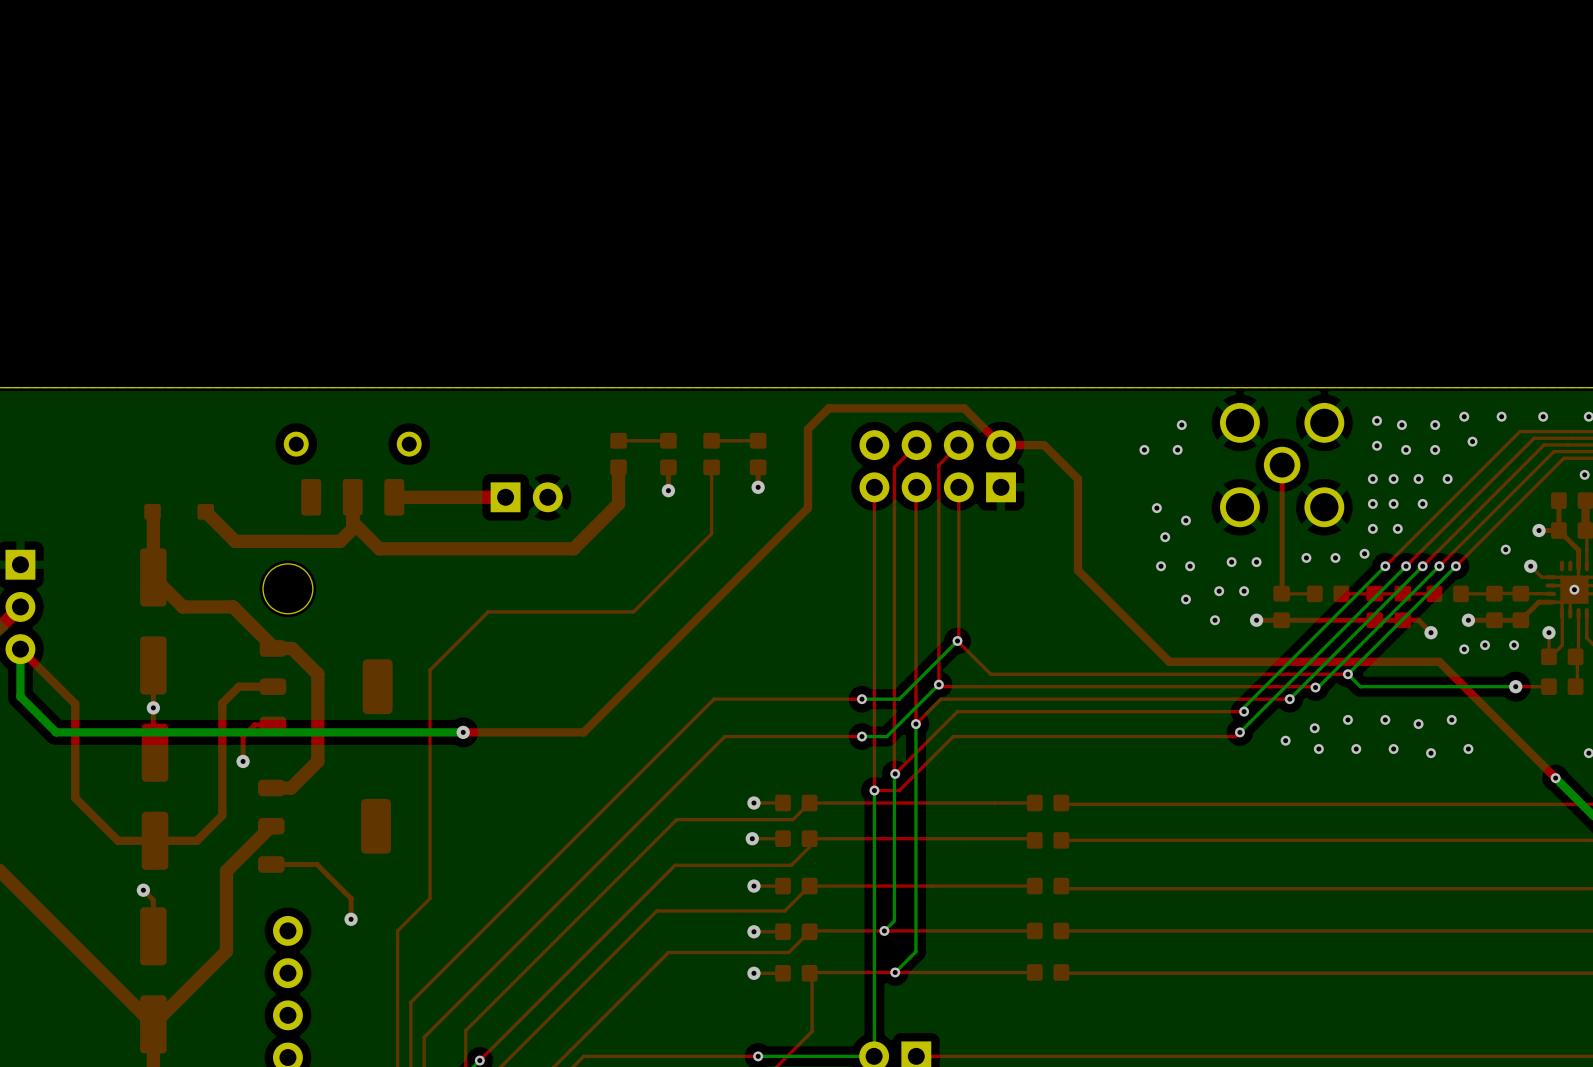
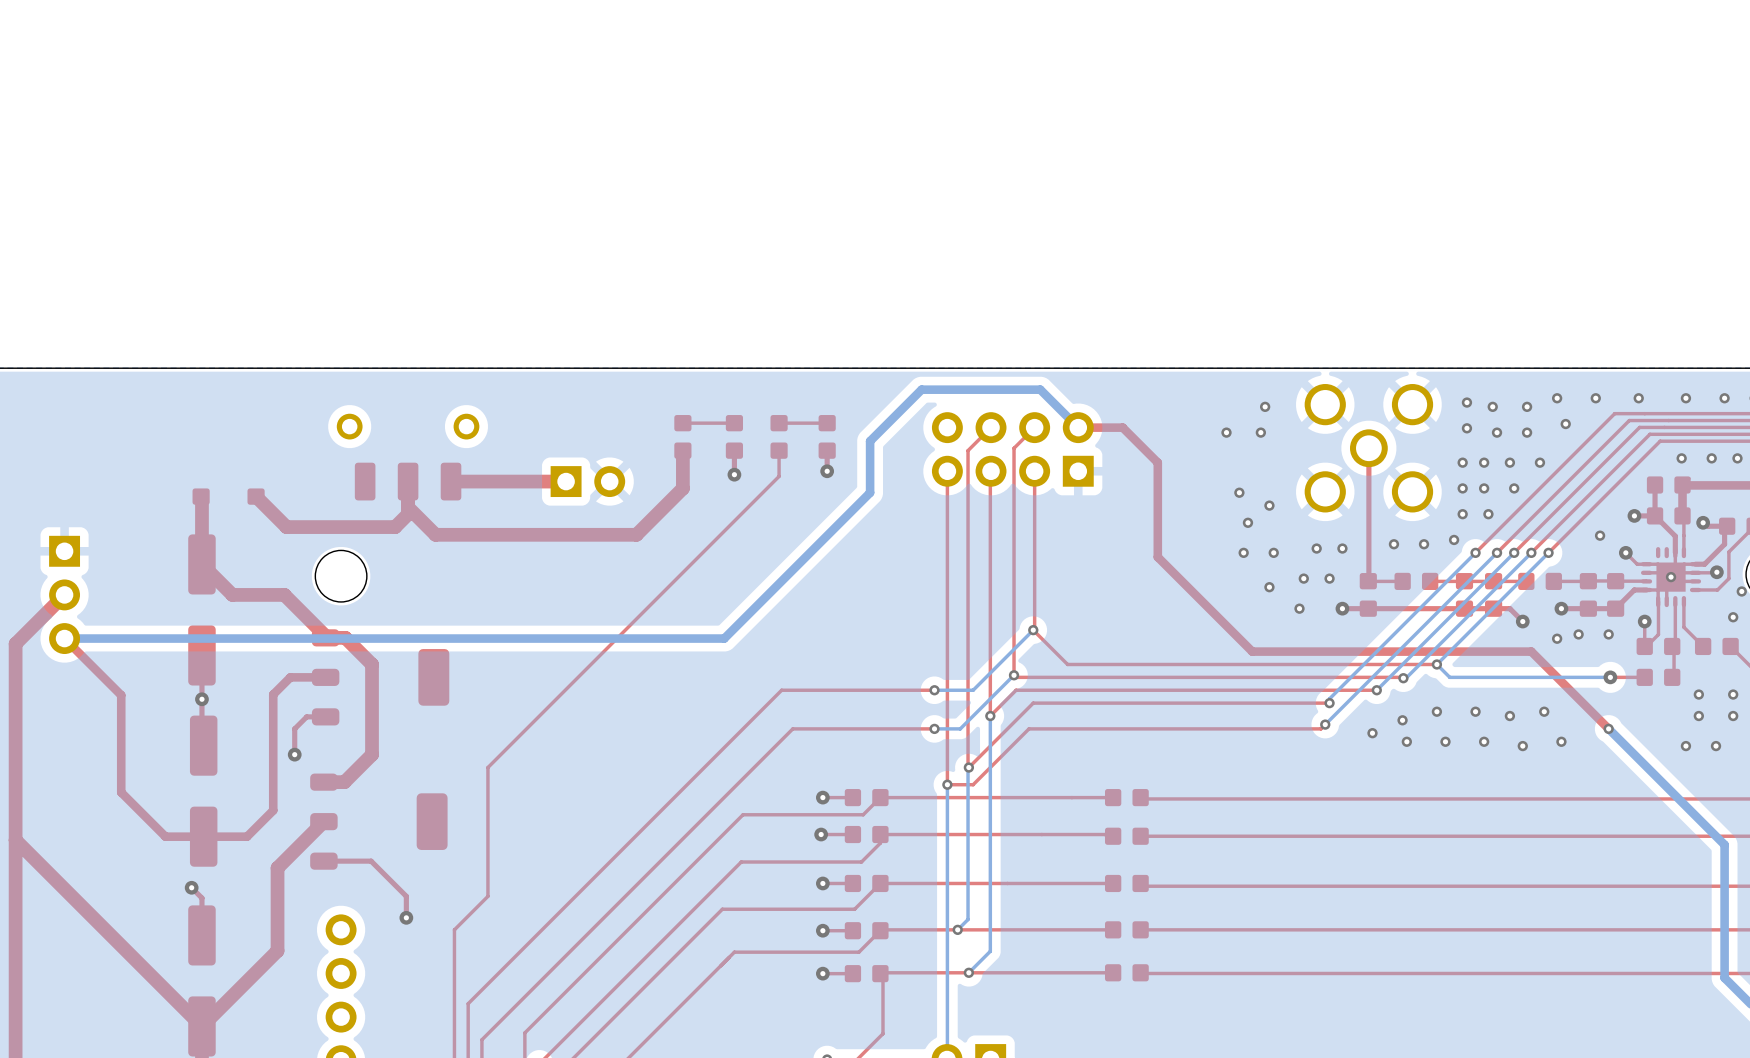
top track: (1001, 445) (964, 408) (828, 408) (807, 429) (807, 508) (583, 732) (463, 732) -> none
top track: (711, 492) (711, 533) (633, 611) (488, 611) (429, 670) (429, 773) -> (779, 476) (487, 767)
bottom track: (20, 649) (20, 696) (56, 732) (463, 732) -> (64, 638) (724, 638) (870, 492) (870, 441) (921, 389) (1040, 389) (1078, 427)
via: (463, 732) -> none
top track: (1514, 736) (1555, 778) -> none
bottom track: none -> (1608, 728) (1651, 771)
via position: (1555, 778) -> (1608, 728)

